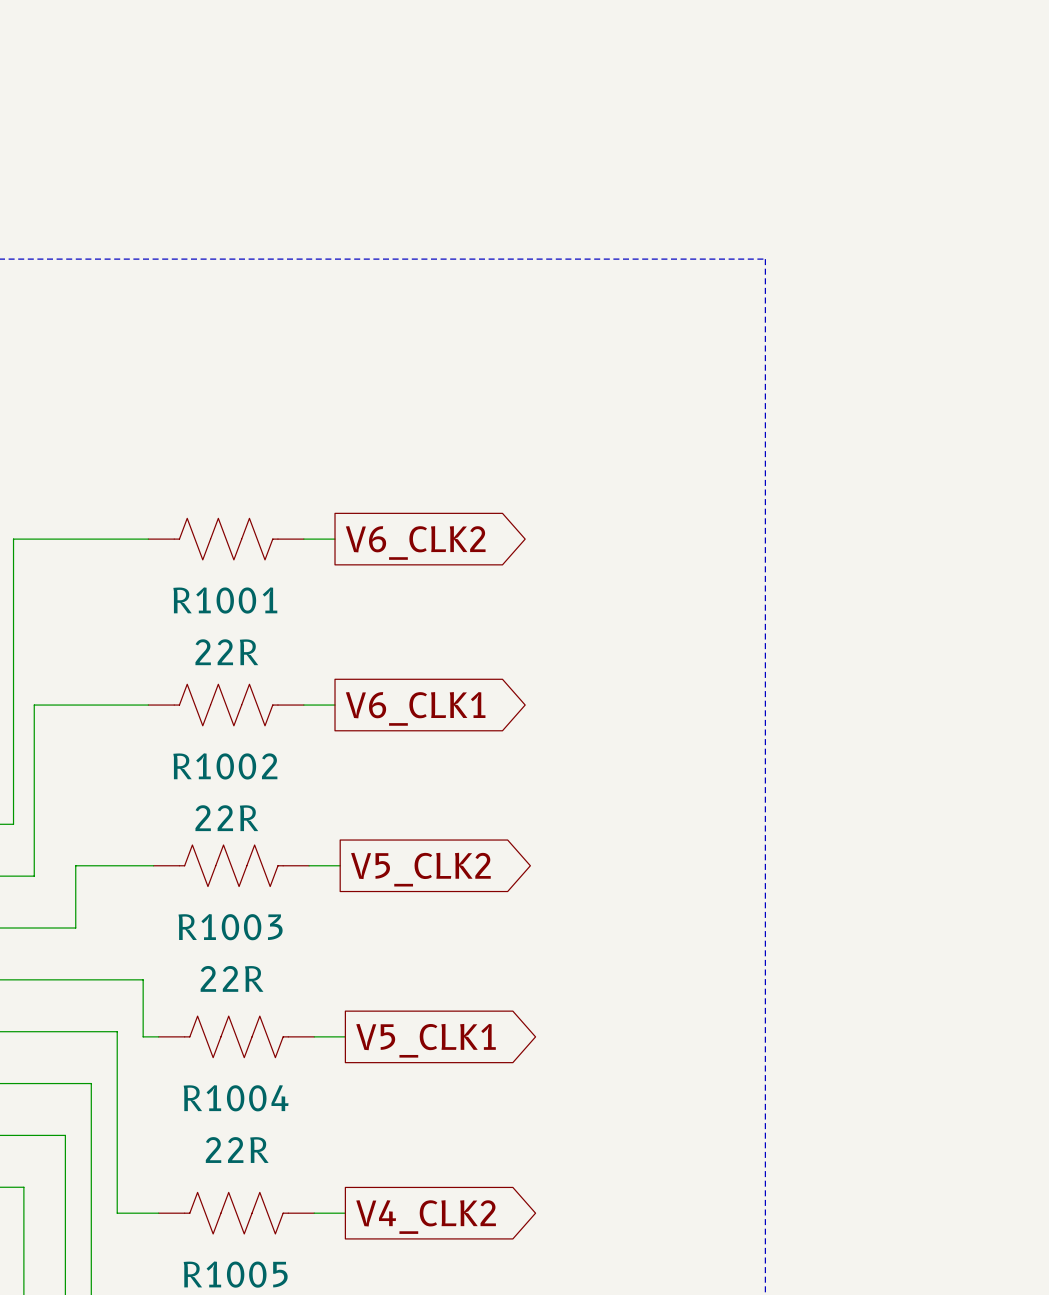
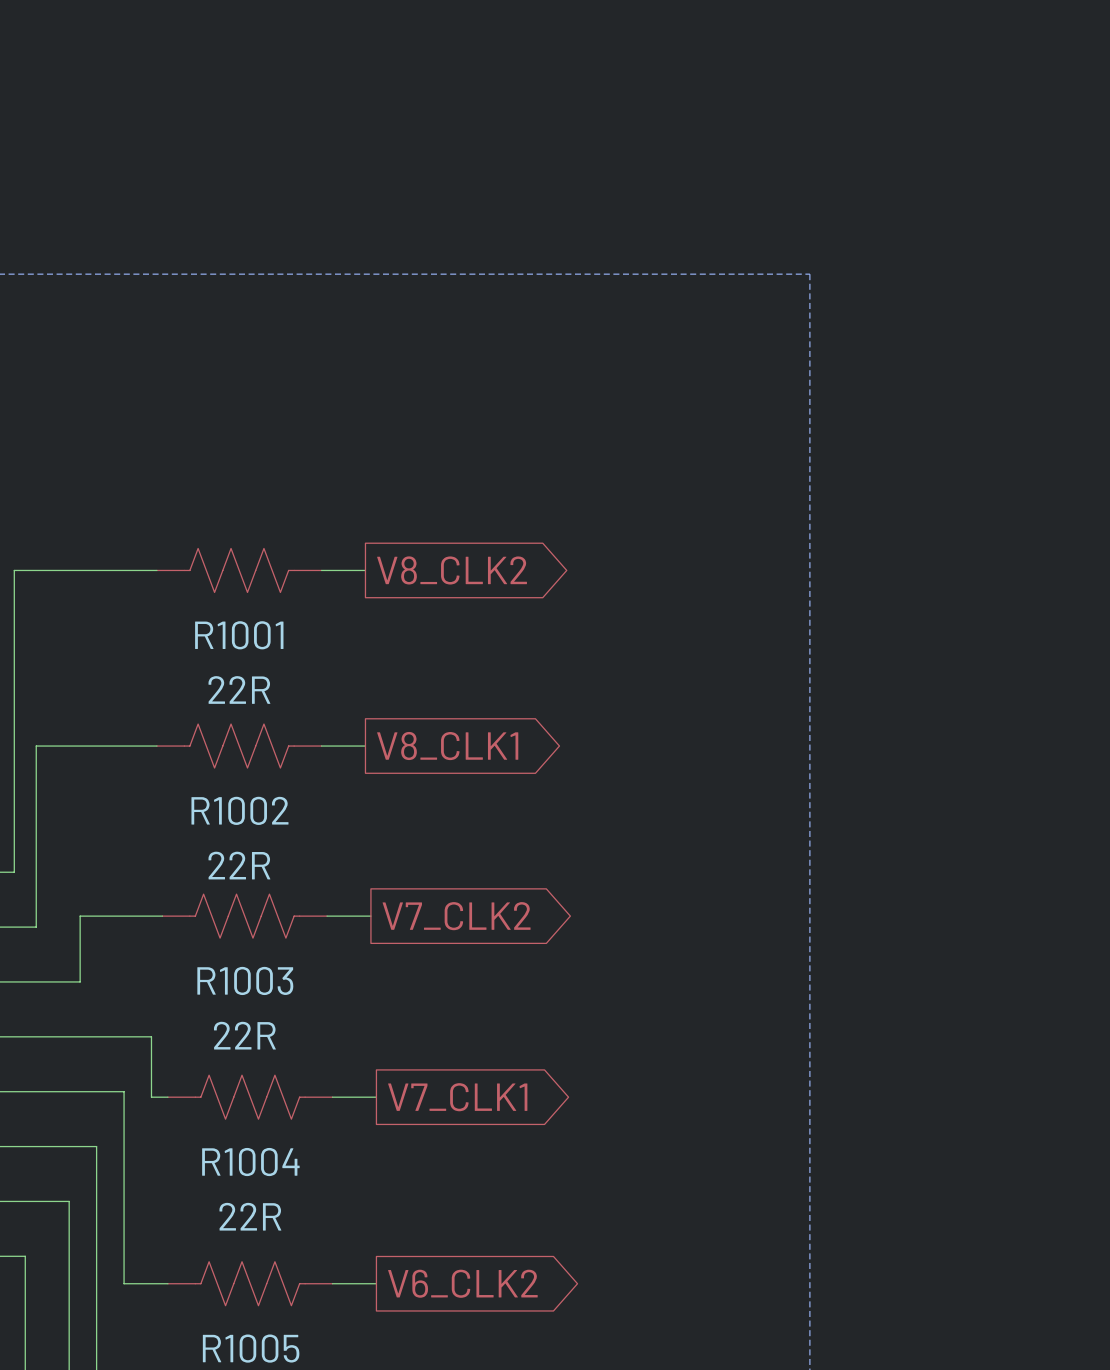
wire: none -> (354, 570) (365, 570)
global label: V6_CLK2 (415, 542) -> V8_CLK2 (452, 570)
wire: none -> (354, 746) (365, 746)
global label: V6_CLK1 (415, 708) -> V8_CLK1 (447, 746)
wire: none -> (359, 916) (370, 916)
global label: V5_CLK2 (420, 869) -> V7_CLK2 (456, 916)
wire: none -> (365, 1097) (376, 1097)
global label: V5_CLK1 (426, 1040) -> V7_CLK1 (457, 1097)
wire: none -> (365, 1283) (376, 1283)
global label: V4_CLK2 (426, 1217) -> V6_CLK2 (462, 1283)

